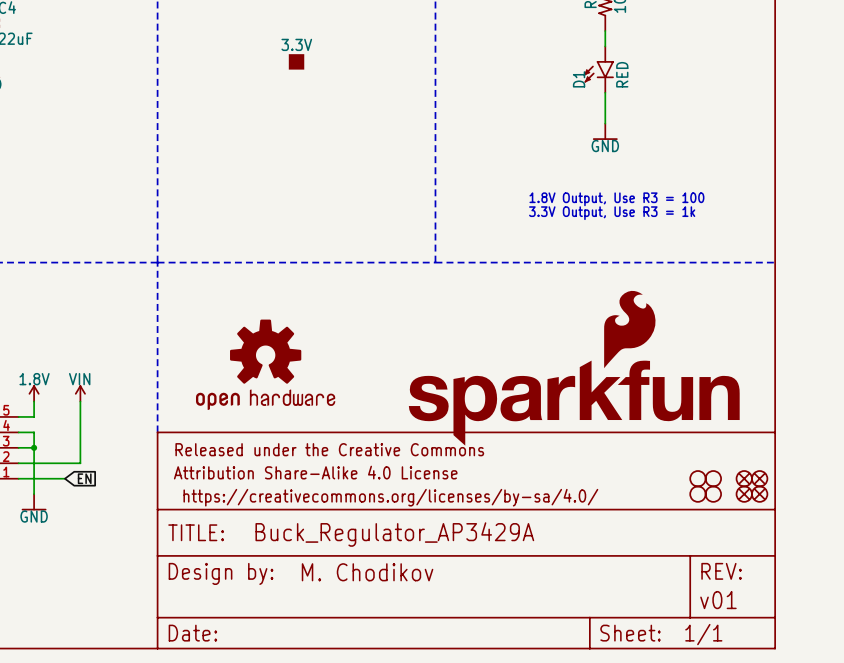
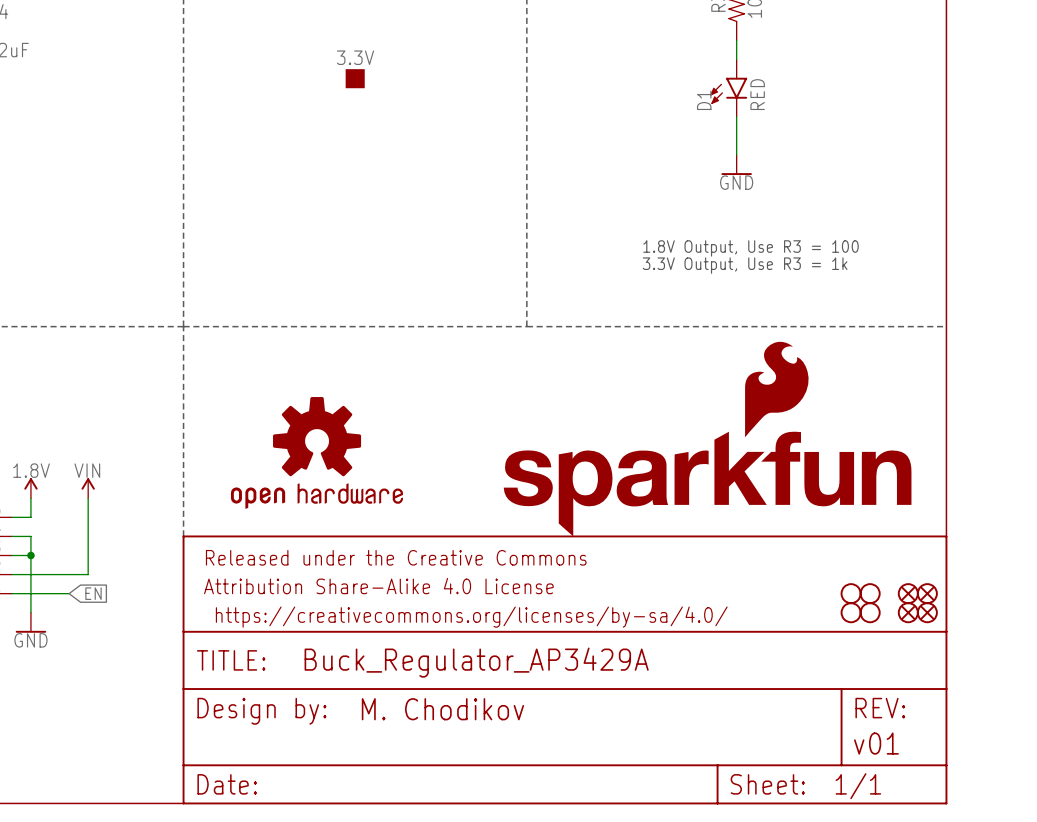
part: none -> (776, 389)
part: (574, 368) -> none
part: none -> (707, 484)

